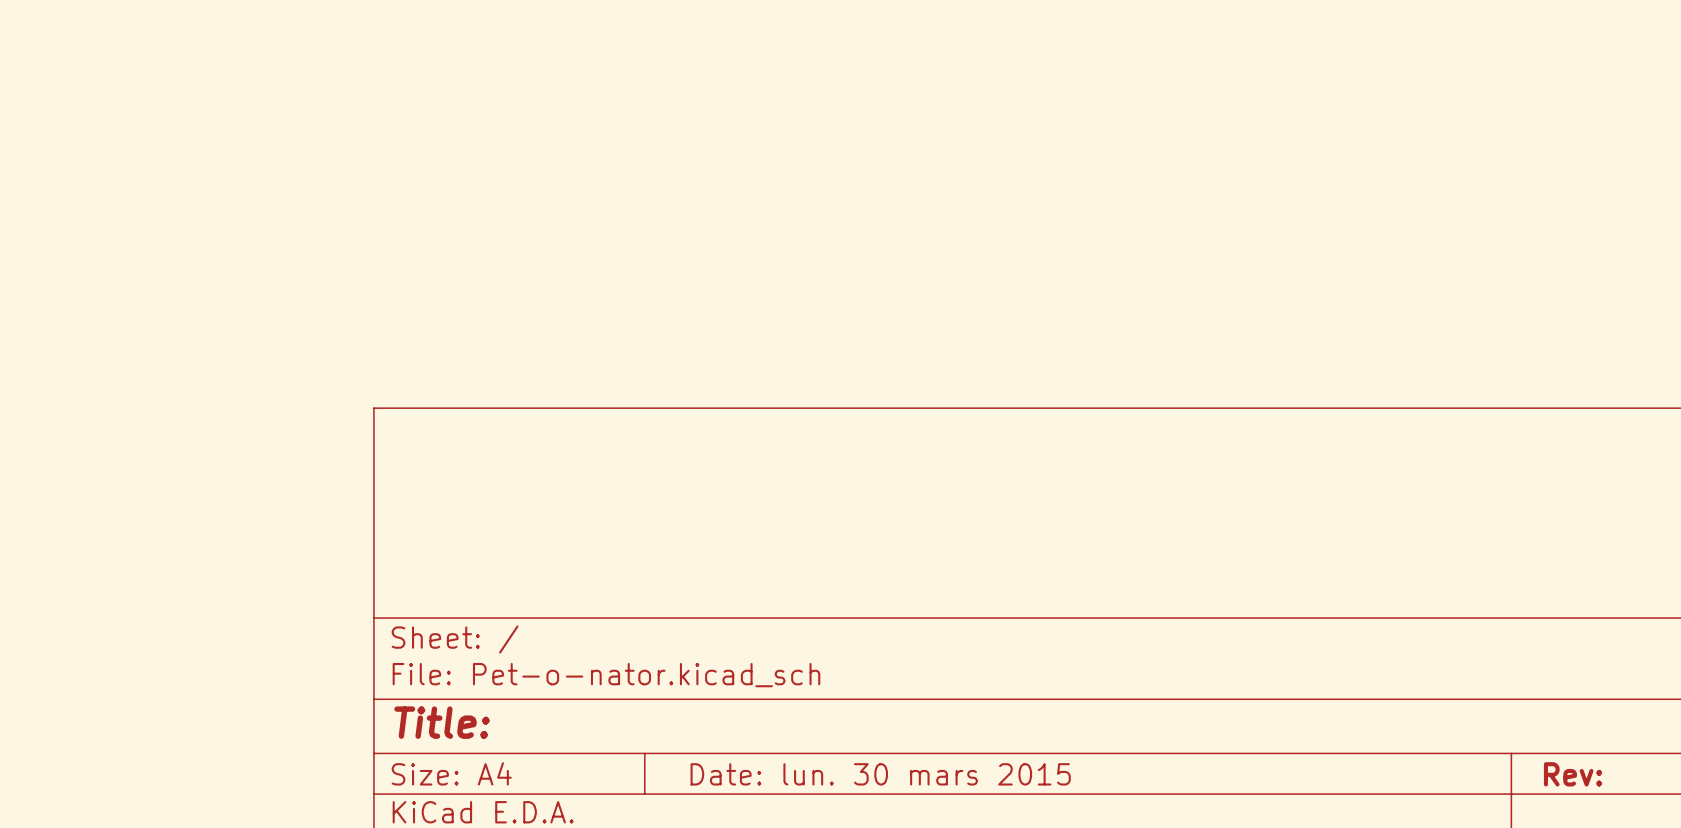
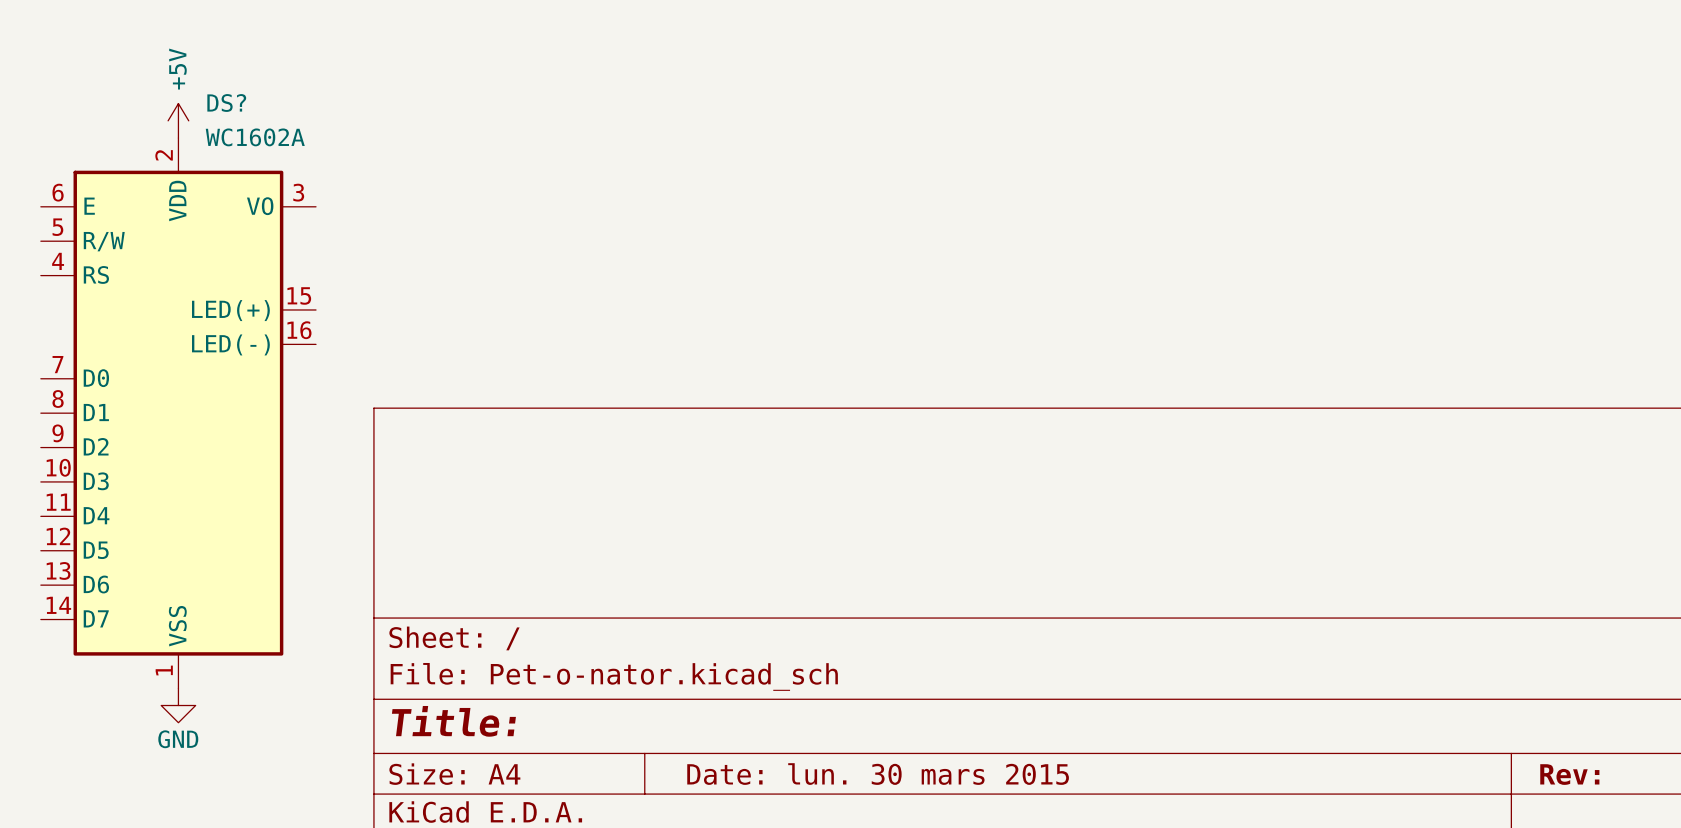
power symbol: none -> +5V (178, 120)
DS?: none -> WC1602A (178, 413)
power symbol: none -> GND (178, 705)

